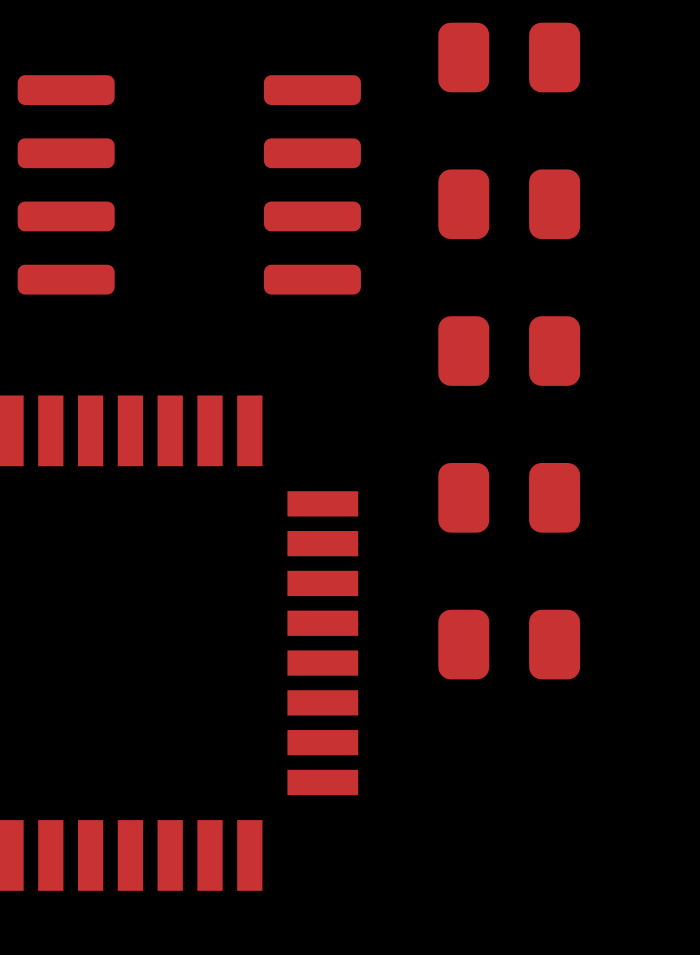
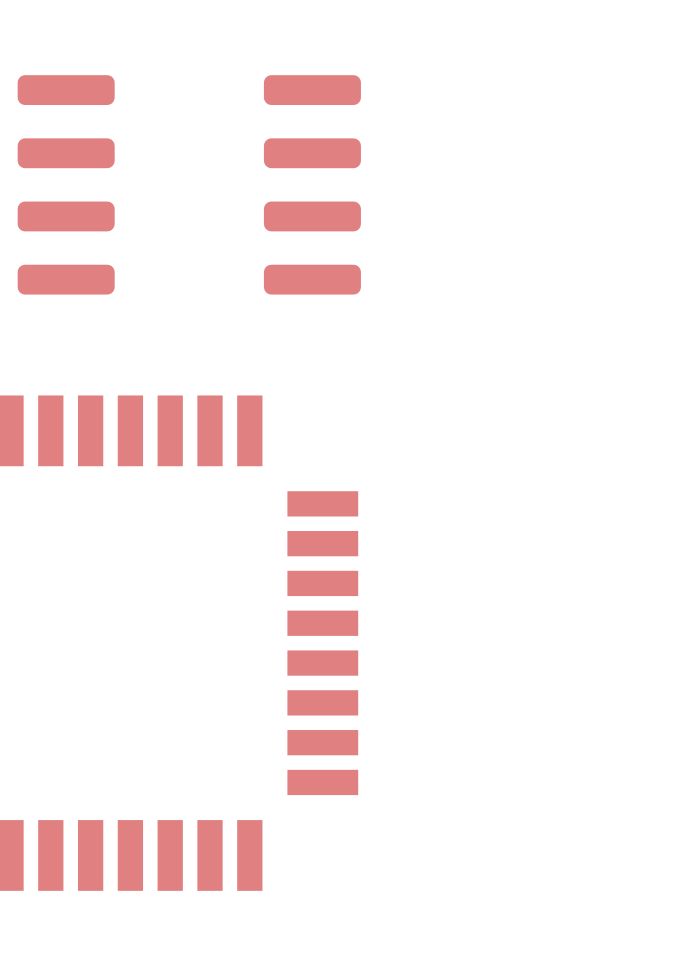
part: (509, 57) -> none
part: (509, 204) -> none
part: (509, 351) -> none
part: (509, 497) -> none
part: (509, 644) -> none

